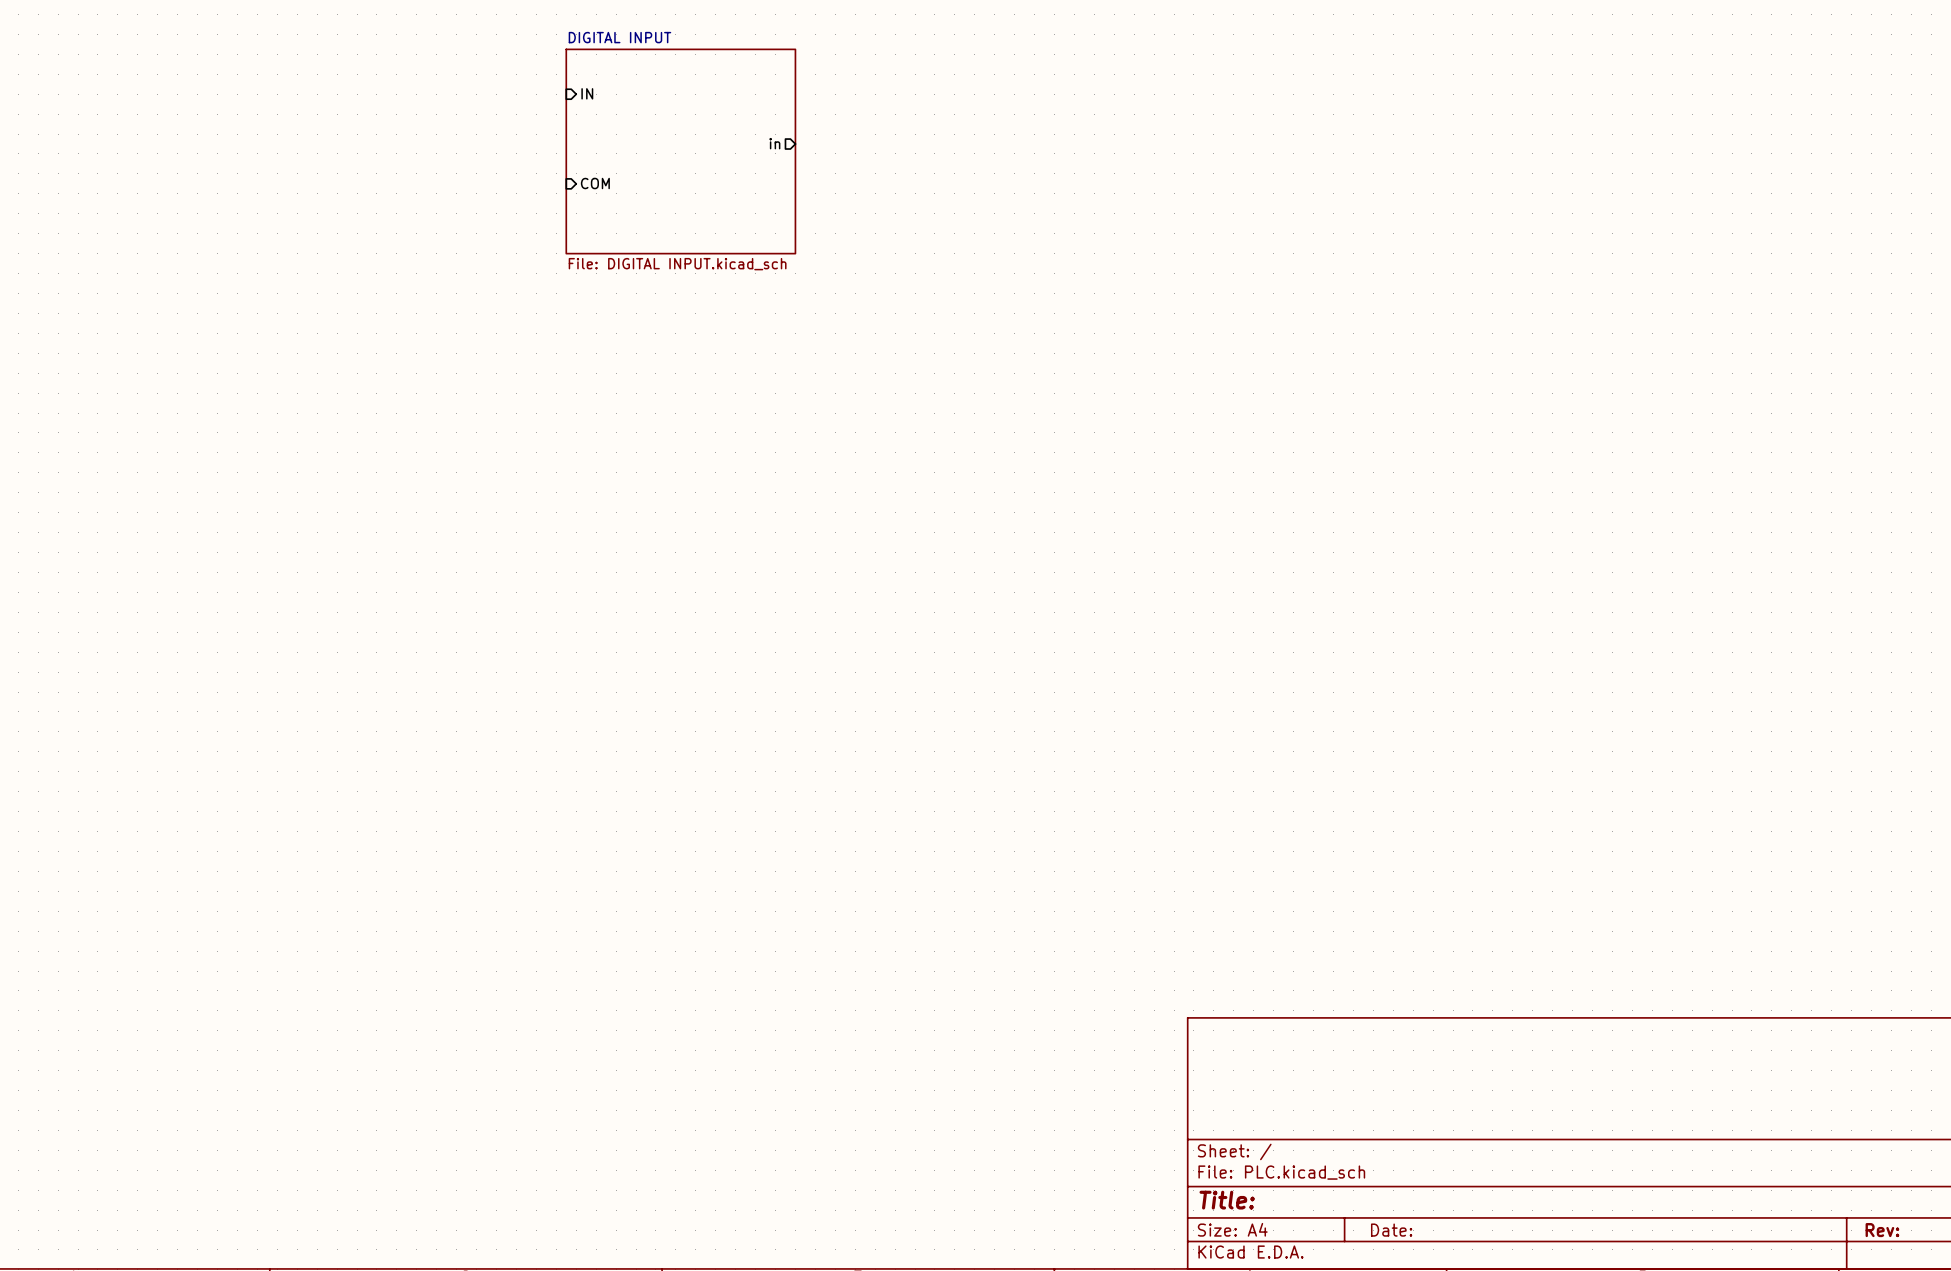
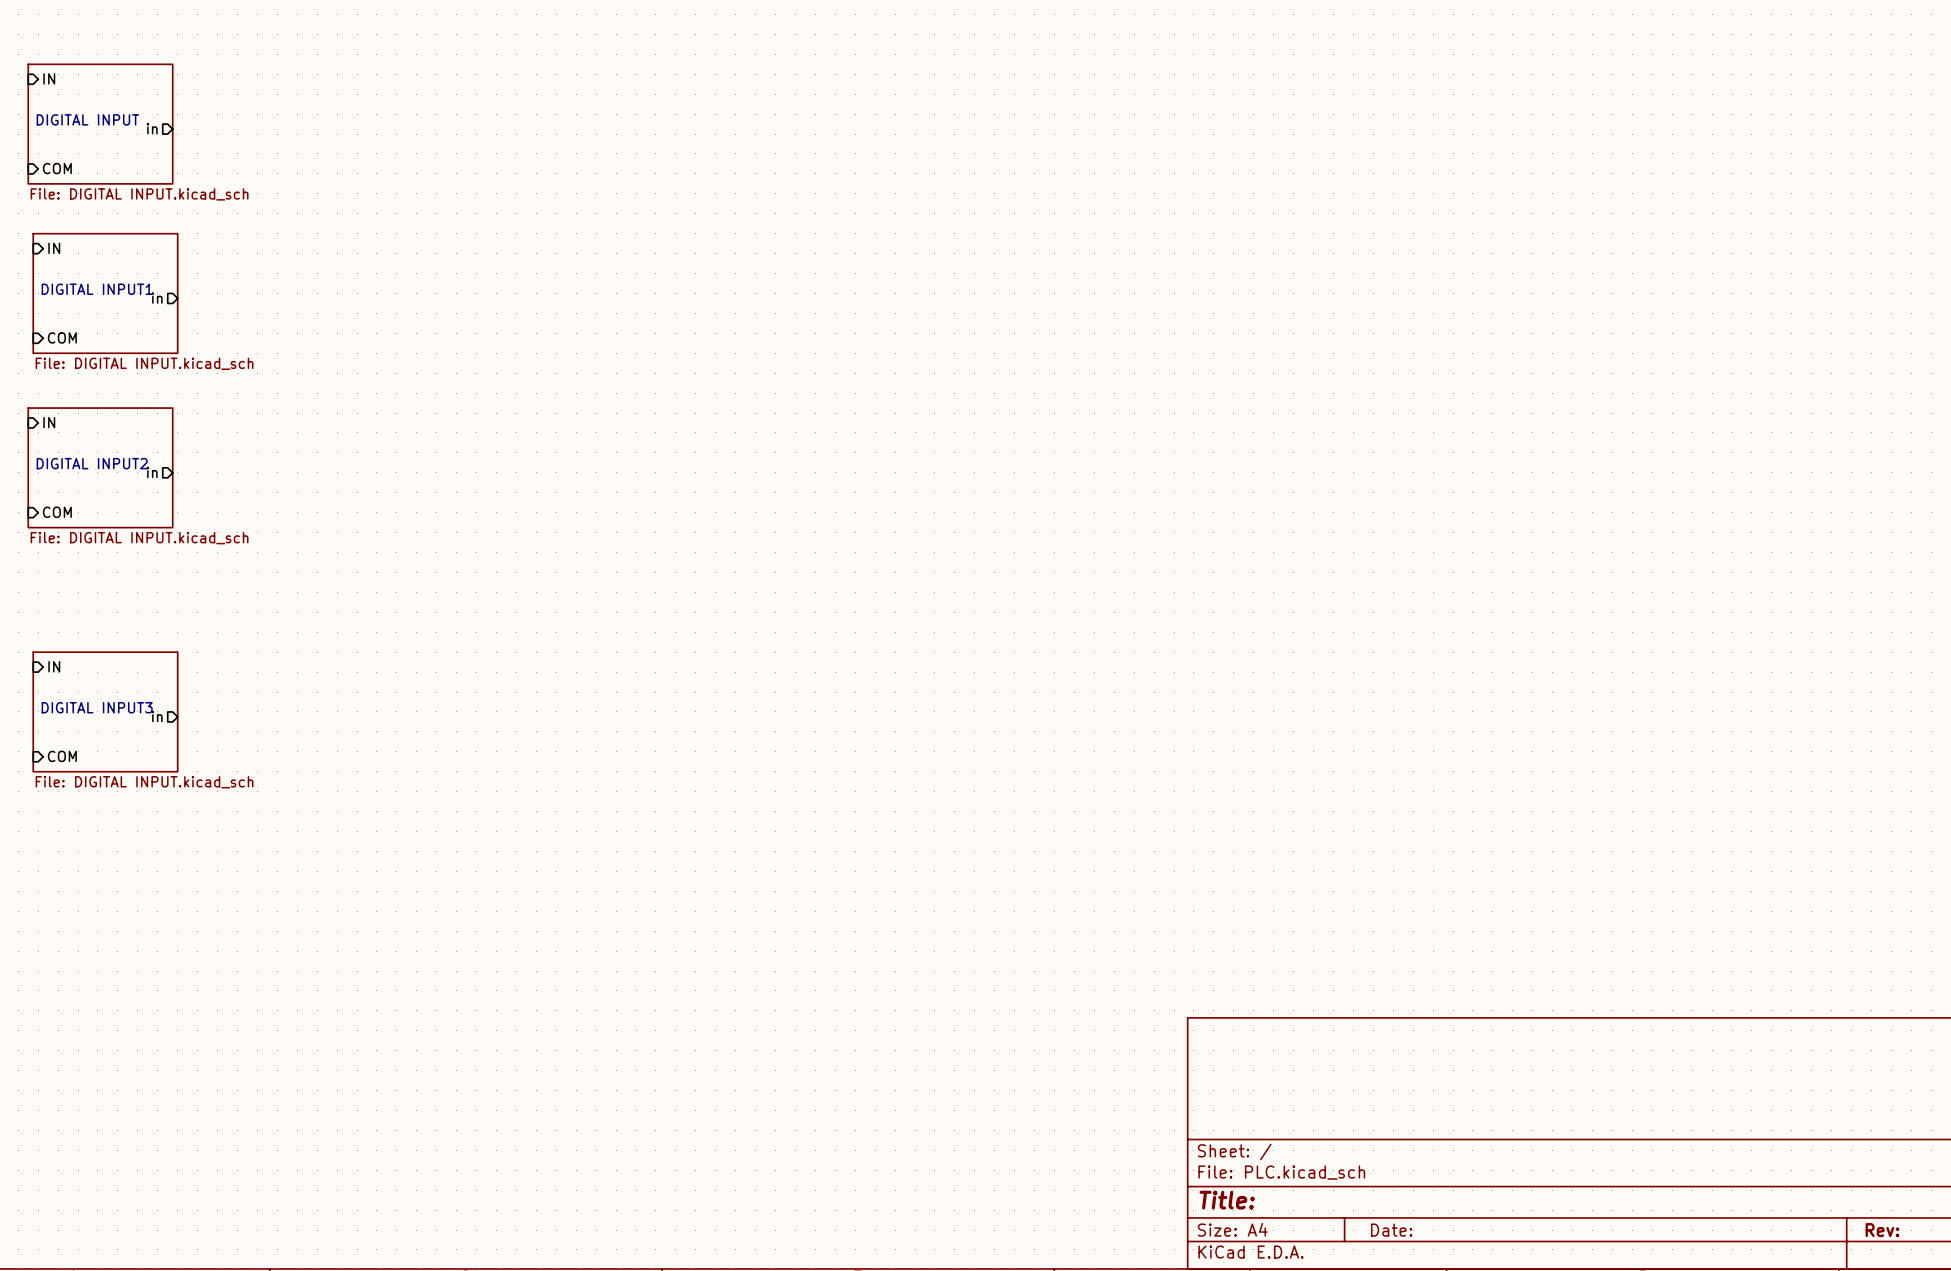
sheet pin: none -> IN (49, 78)
sheet pin: IN (587, 93) -> none
sheet DIGITAL INPUT: none -> File: DIGITAL INPUT.kicad_sch (100, 124)
sheet pin: none -> in (152, 128)
sheet pin: in (774, 143) -> none
sheet DIGITAL INPUT: File: DIGITAL INPUT.kicad_sch (680, 151) -> none
sheet pin: none -> COM (57, 168)
sheet pin: COM (595, 183) -> none
sheet pin: none -> IN (54, 248)
sheet DIGITAL INPUT1: none -> File: DIGITAL INPUT.kicad_sch (105, 293)
sheet pin: none -> in (157, 298)
sheet pin: none -> COM (62, 337)
sheet pin: none -> IN (49, 422)
sheet DIGITAL INPUT2: none -> File: DIGITAL INPUT.kicad_sch (100, 467)
sheet pin: none -> in (152, 472)
sheet pin: none -> COM (57, 512)
sheet pin: none -> IN (54, 666)
sheet DIGITAL INPUT3: none -> File: DIGITAL INPUT.kicad_sch (105, 711)
sheet pin: none -> in (157, 716)
sheet pin: none -> COM (62, 756)

